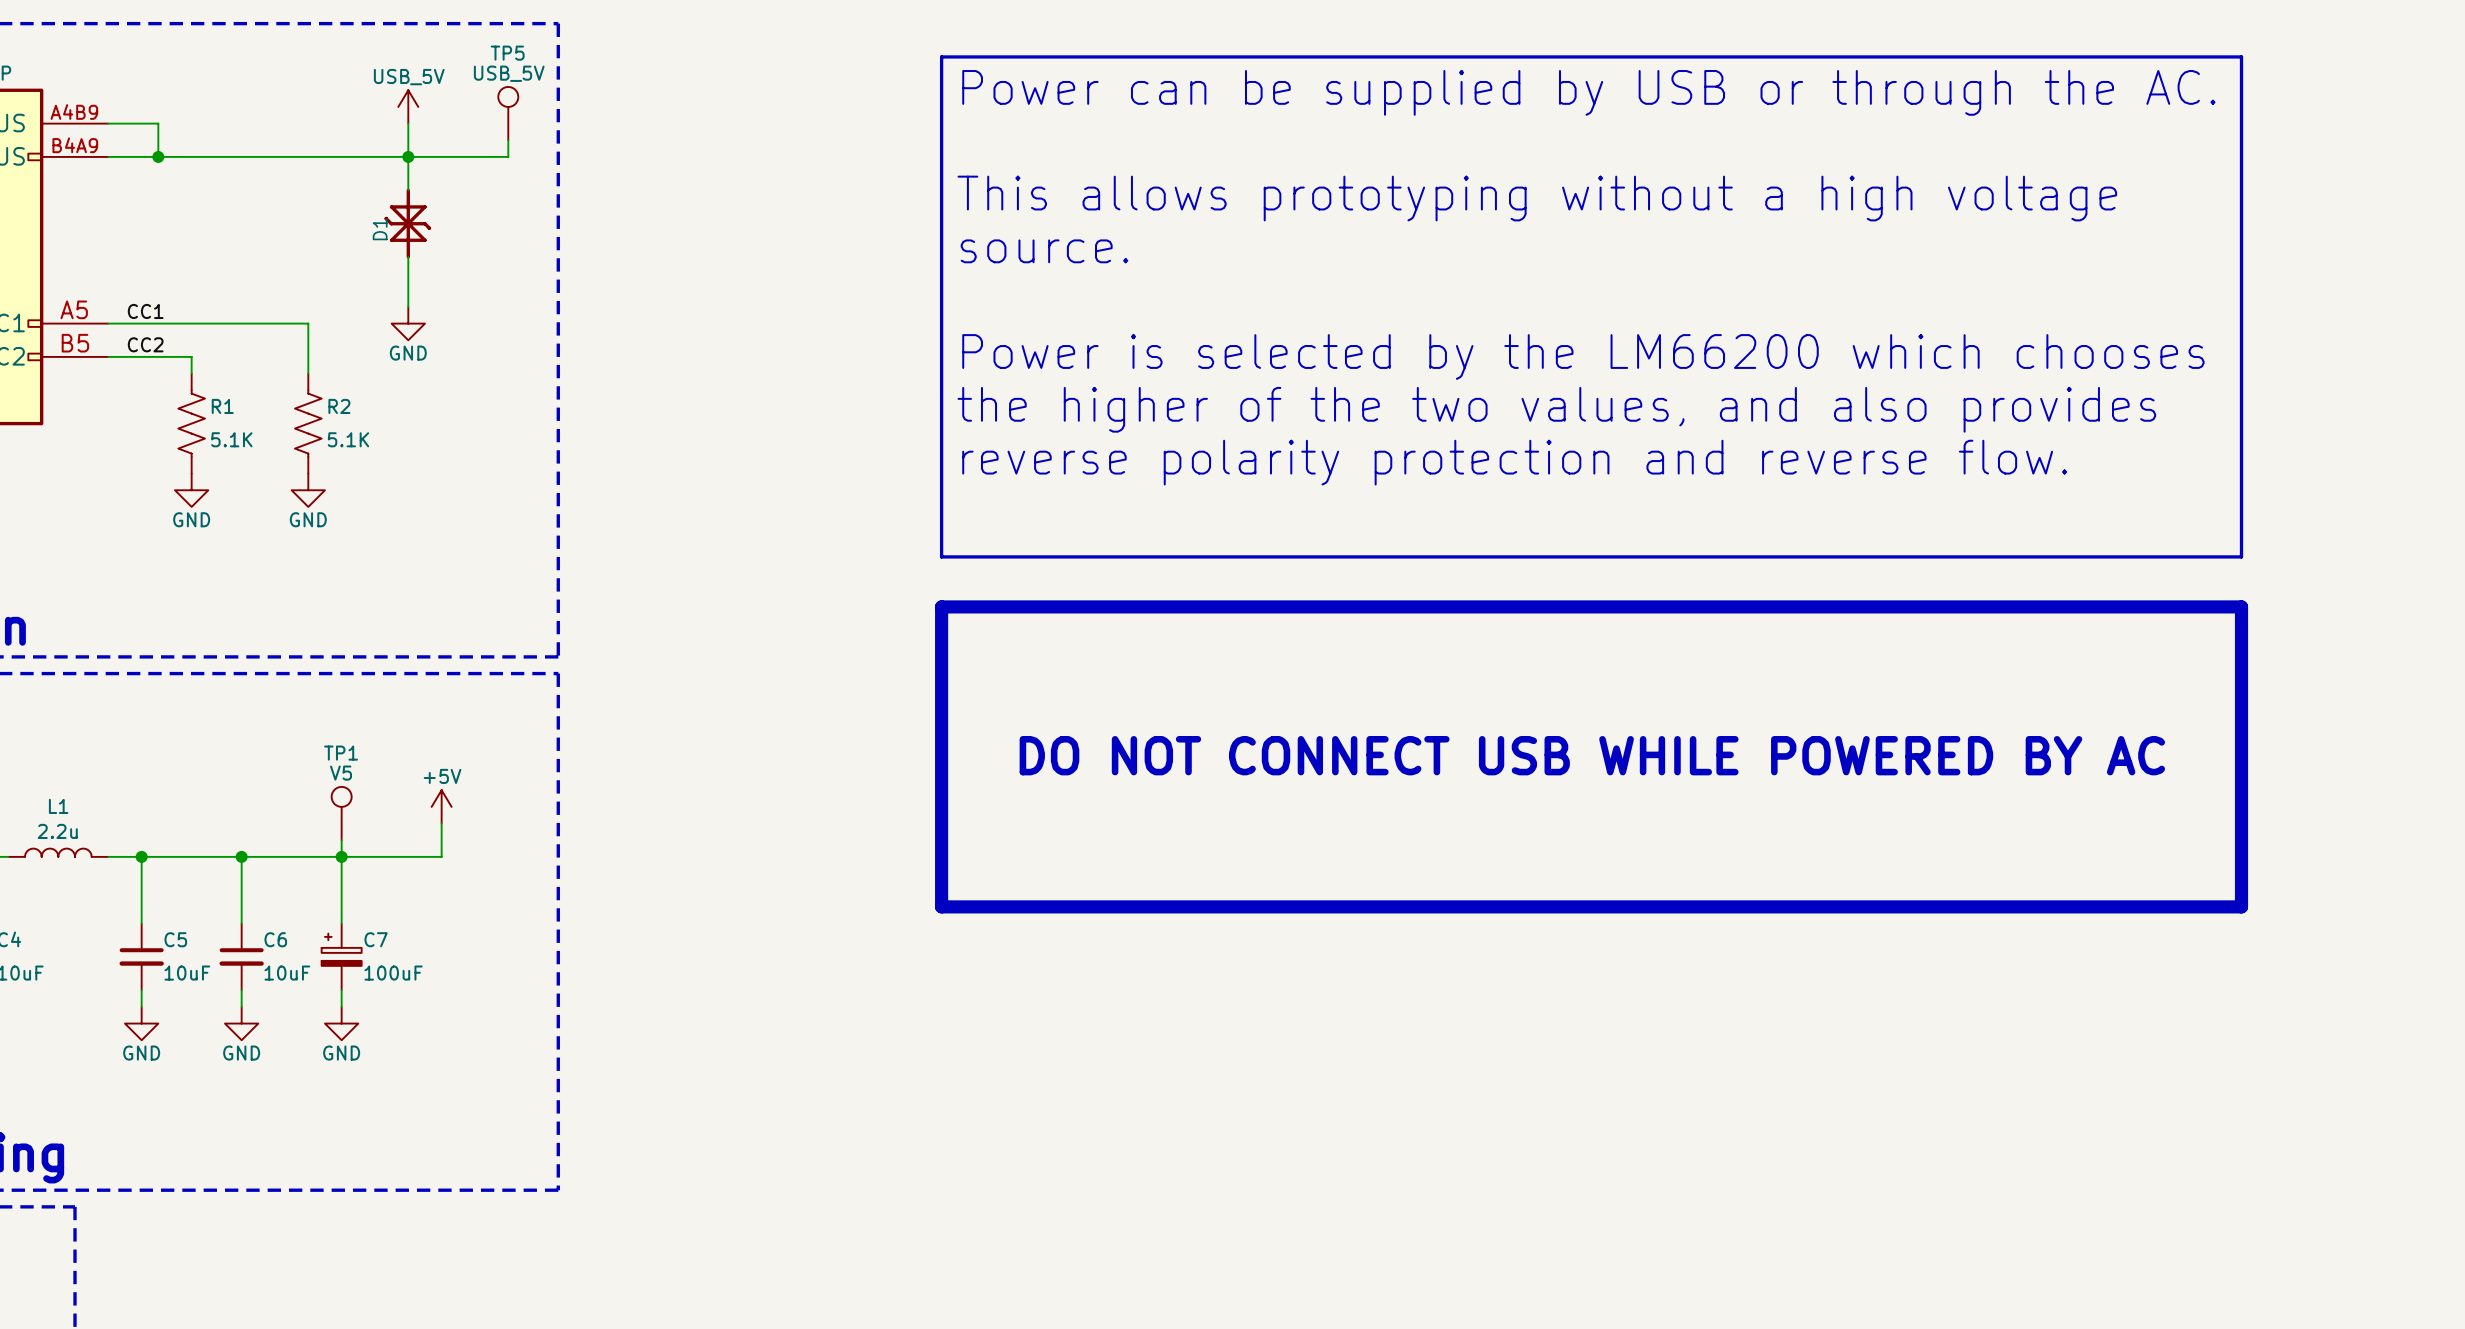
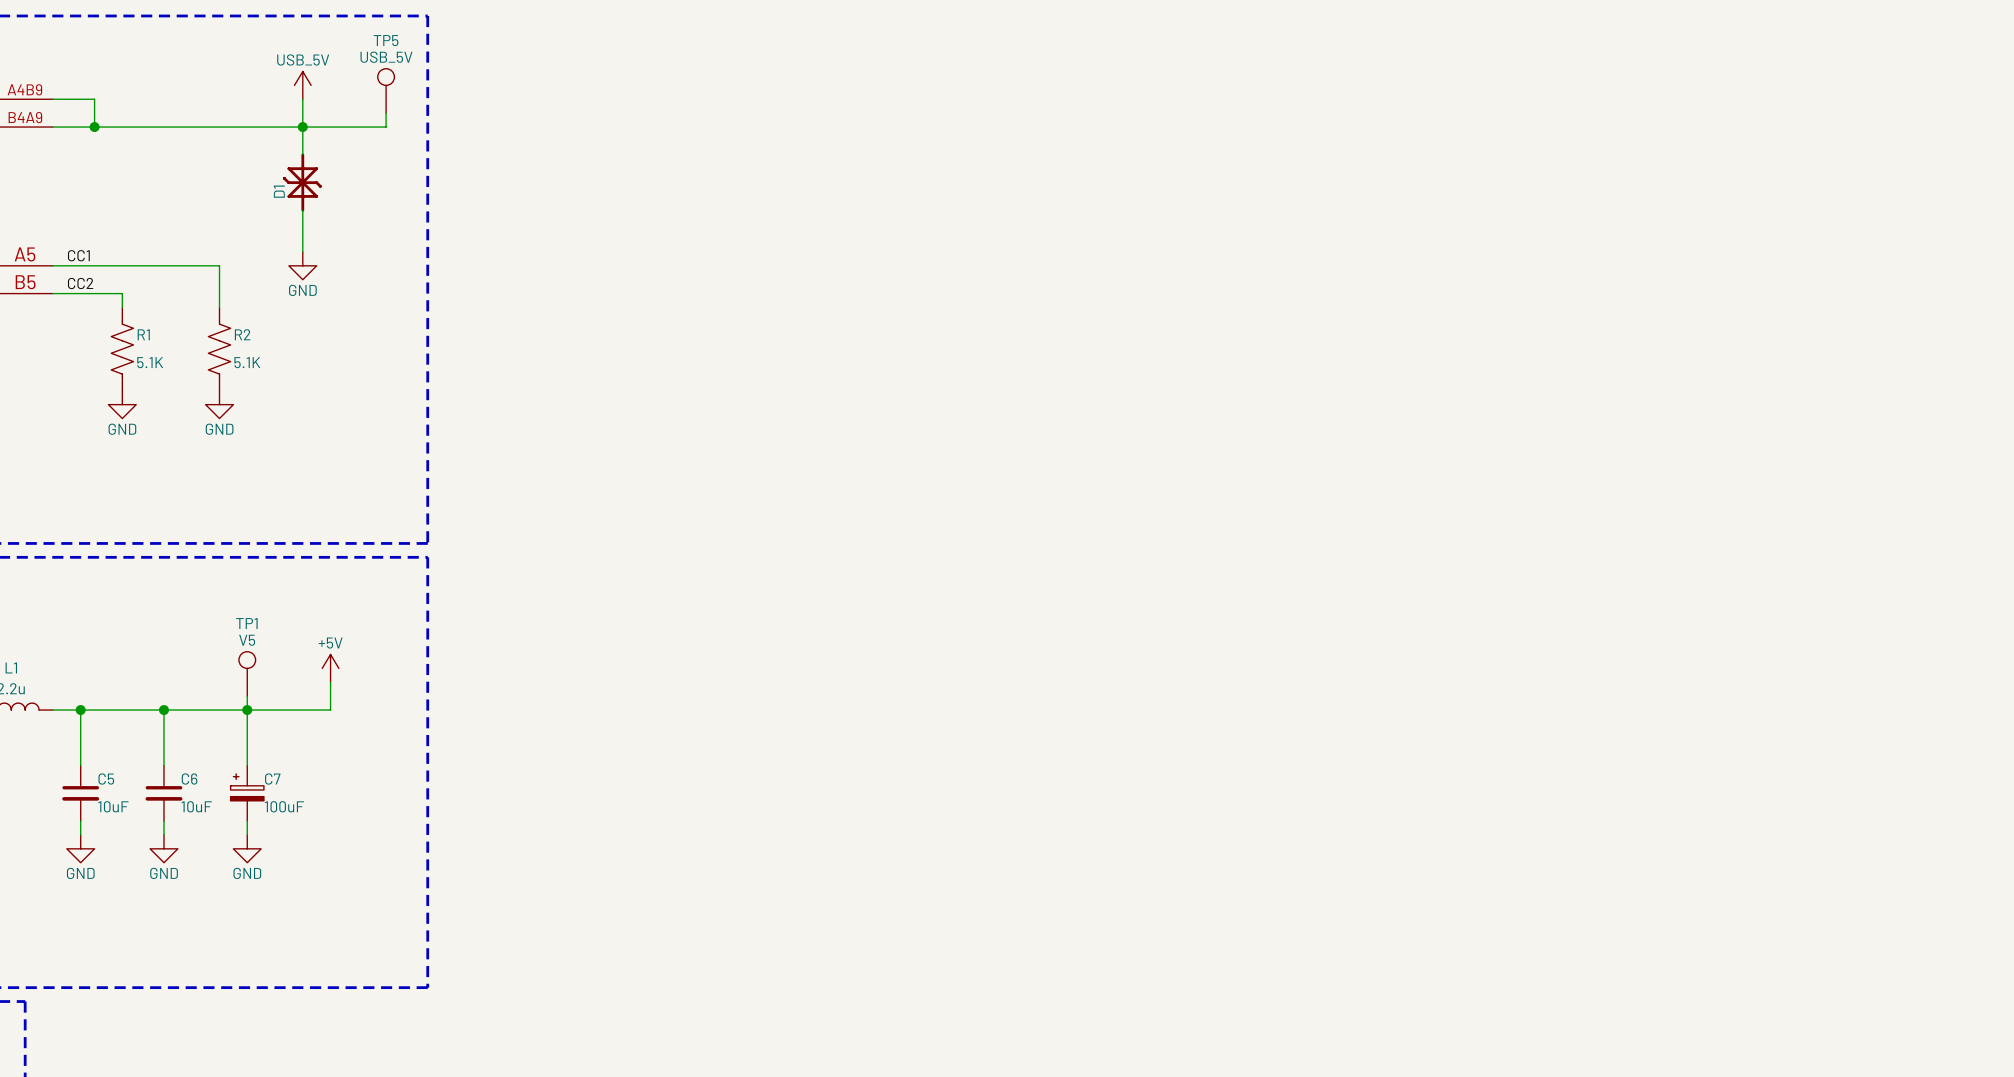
line: (941, 56) (2241, 56) (2241, 556) (941, 556) (941, 56) -> none
text: Power can be supplied by USB or through the AC. (1588, 92) -> none
text: This allows prototyping without a high voltage (1537, 198) -> none
text: source. (1044, 251) -> none
text: Power is selected by the LM66200 which chooses (1583, 356) -> none
text: the higher of the two values, and also provides (1556, 409) -> none
text: reverse polarity protection and reverse flow. (1514, 462) -> none
line: (941, 606) (2241, 606) (2241, 906) (941, 906) (941, 606) -> none
text: DO NOT CONNECT USB WHILE POWERED BY AC (1592, 755) -> none

